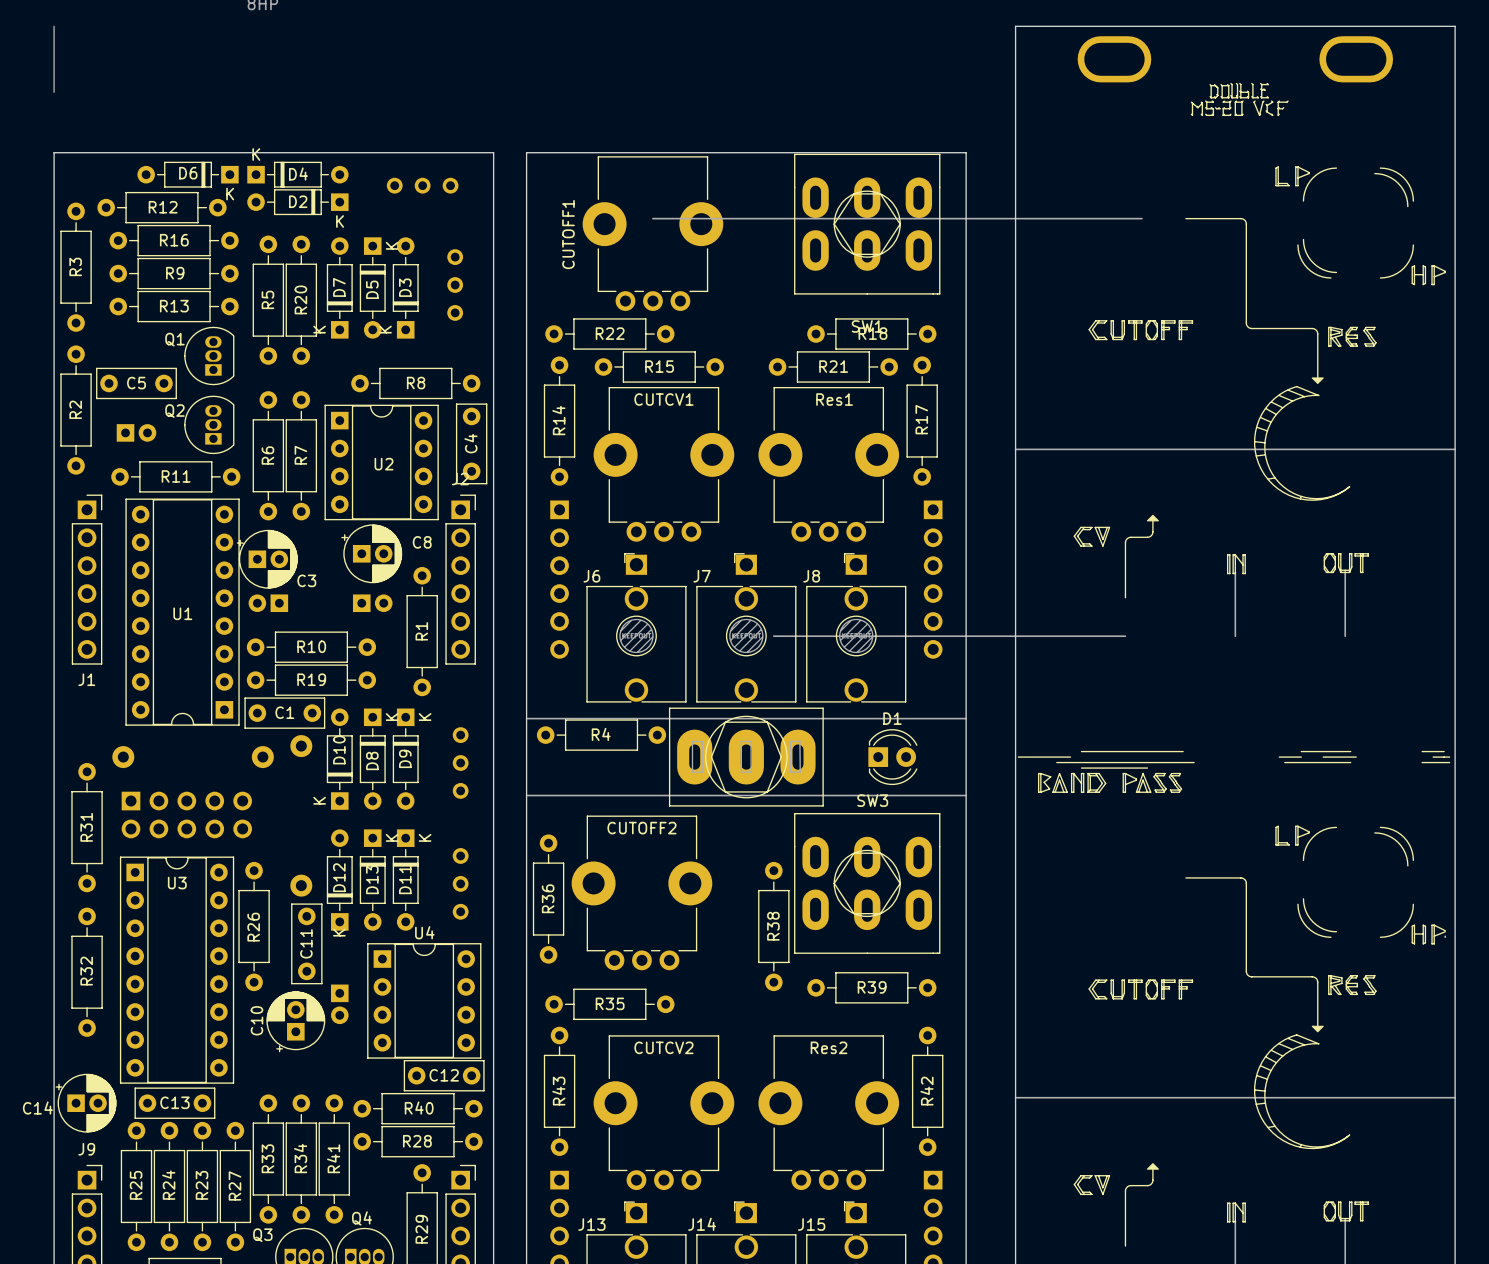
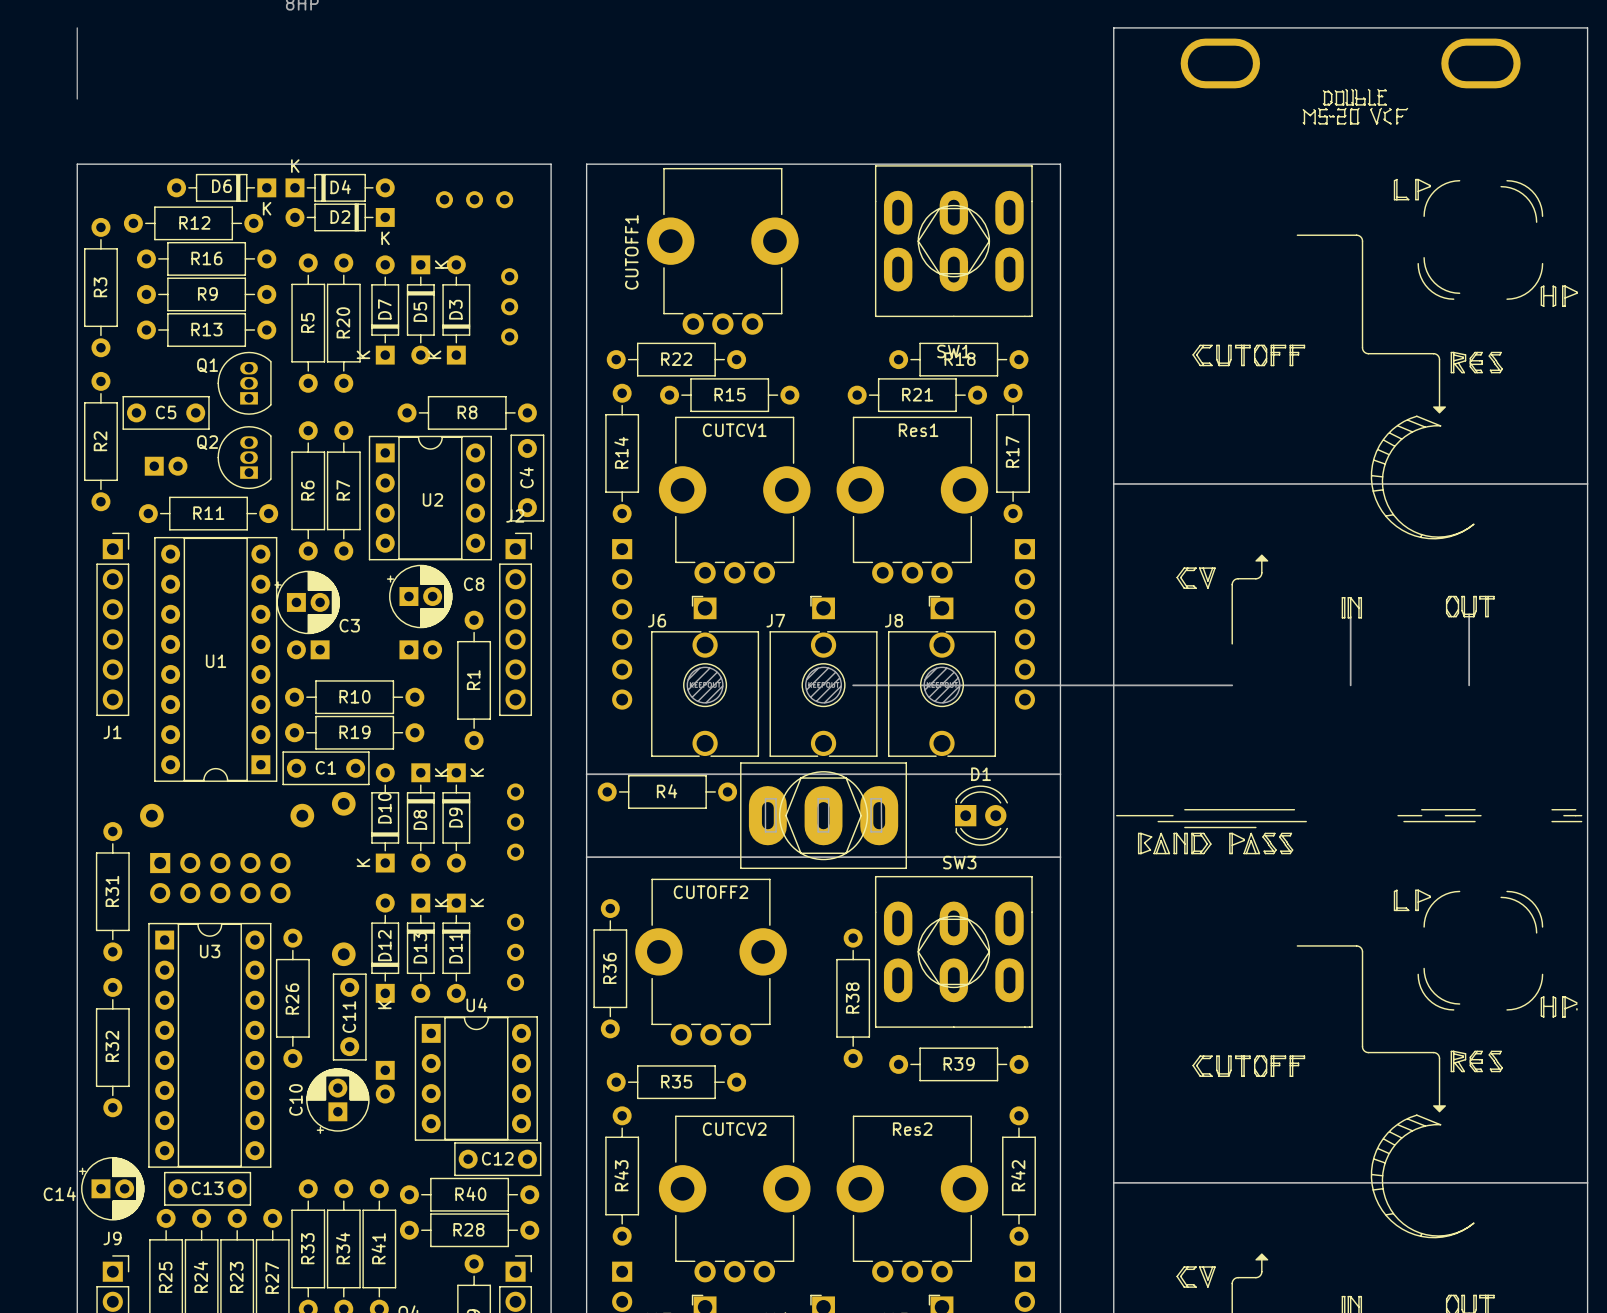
line: (652, 218) (1141, 218) -> none

